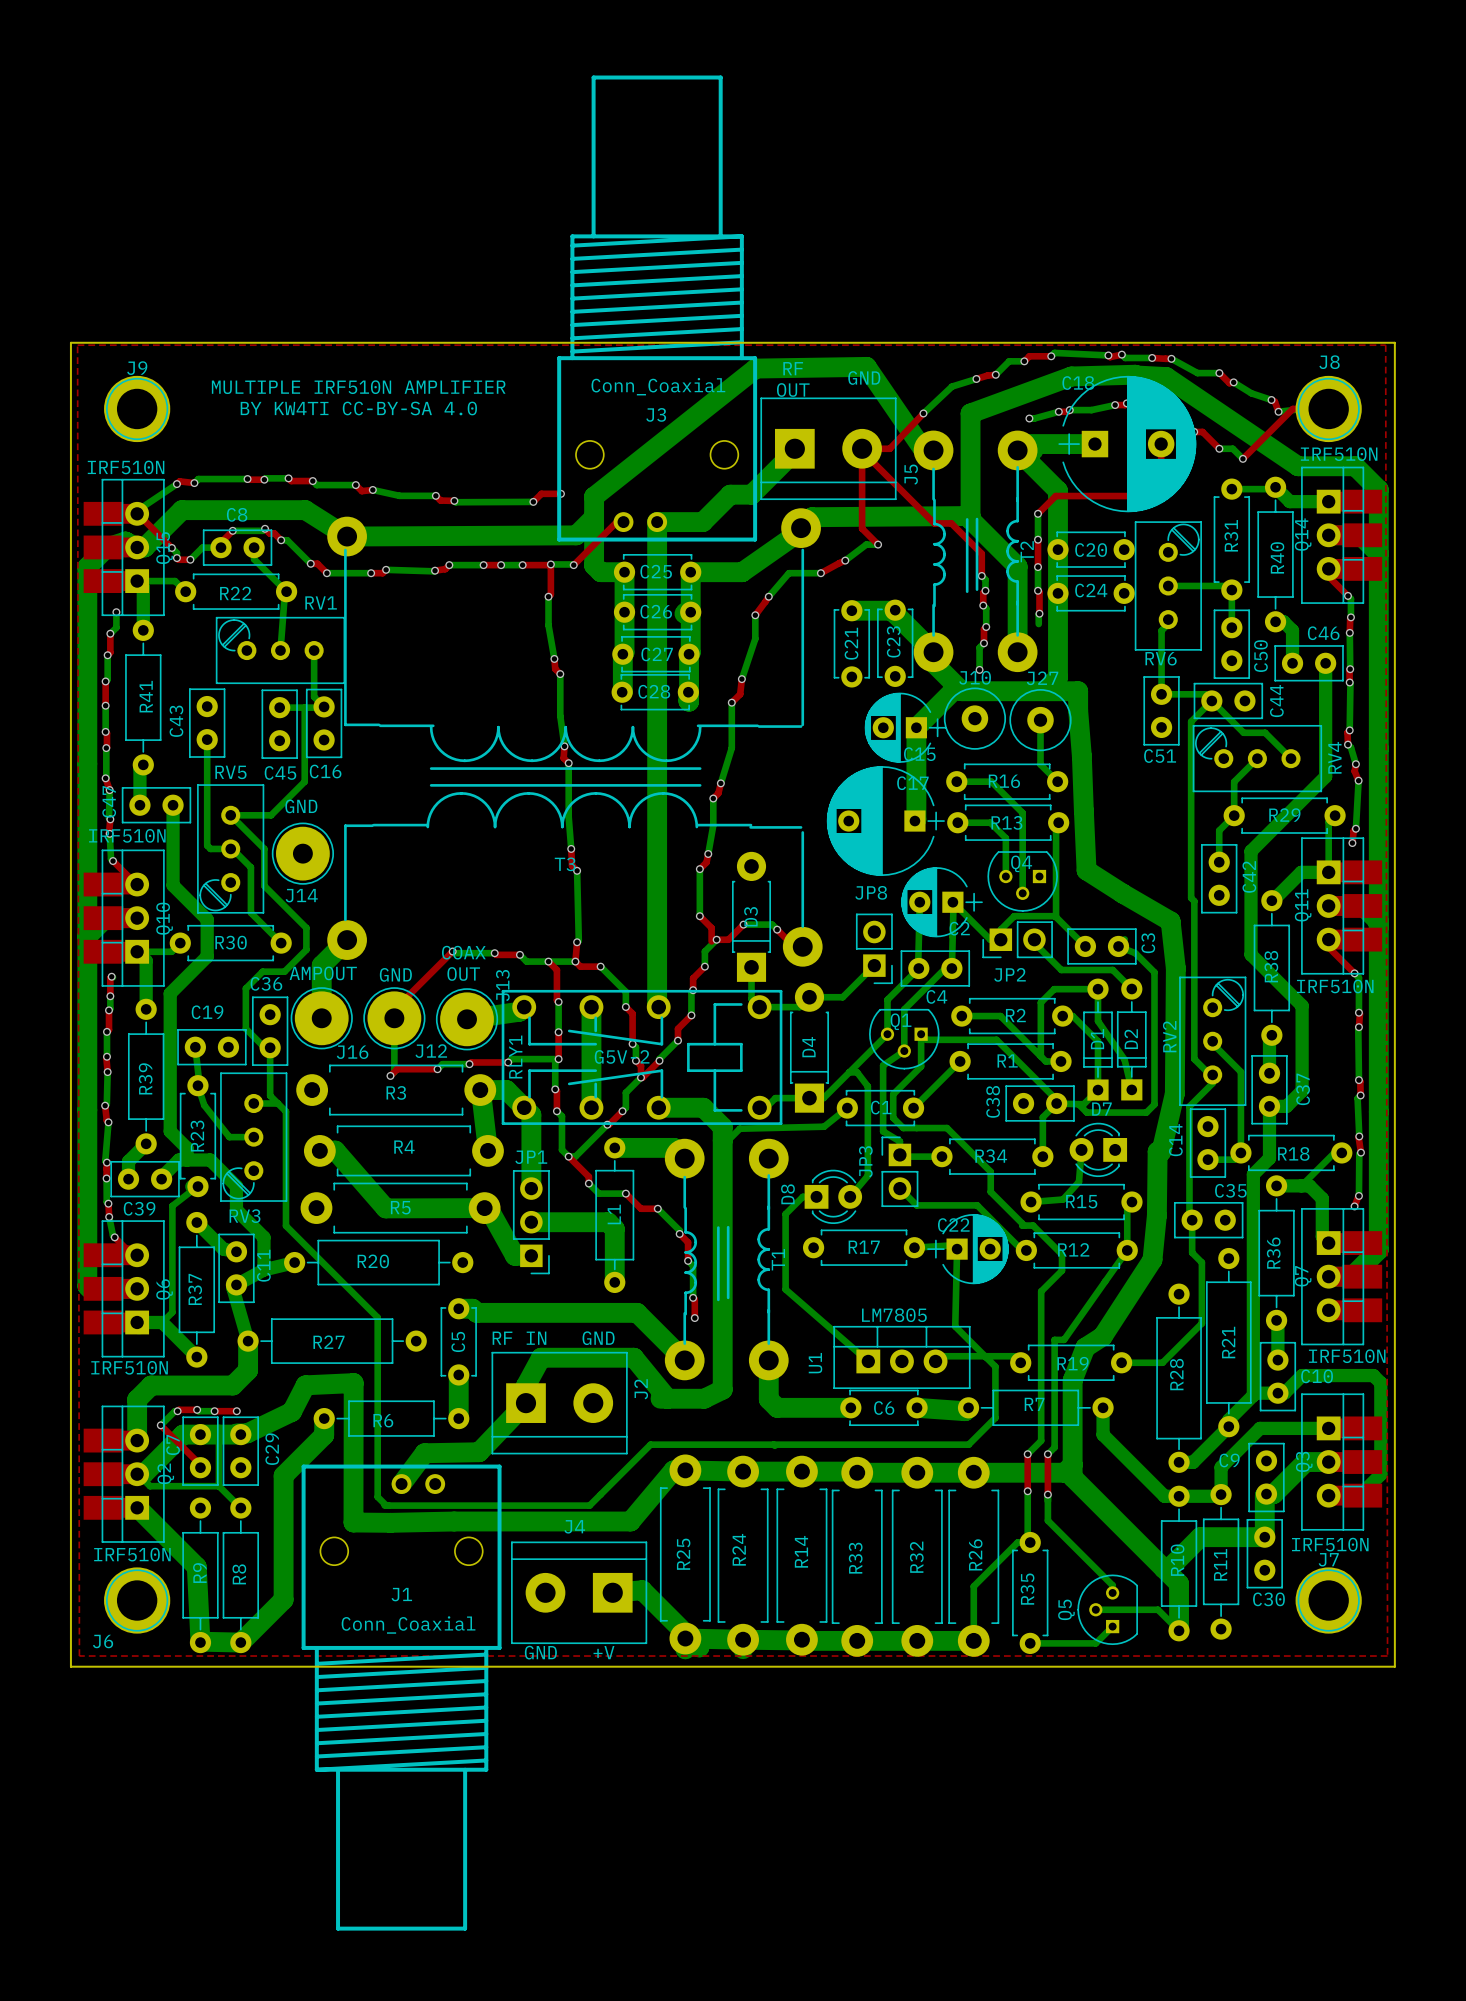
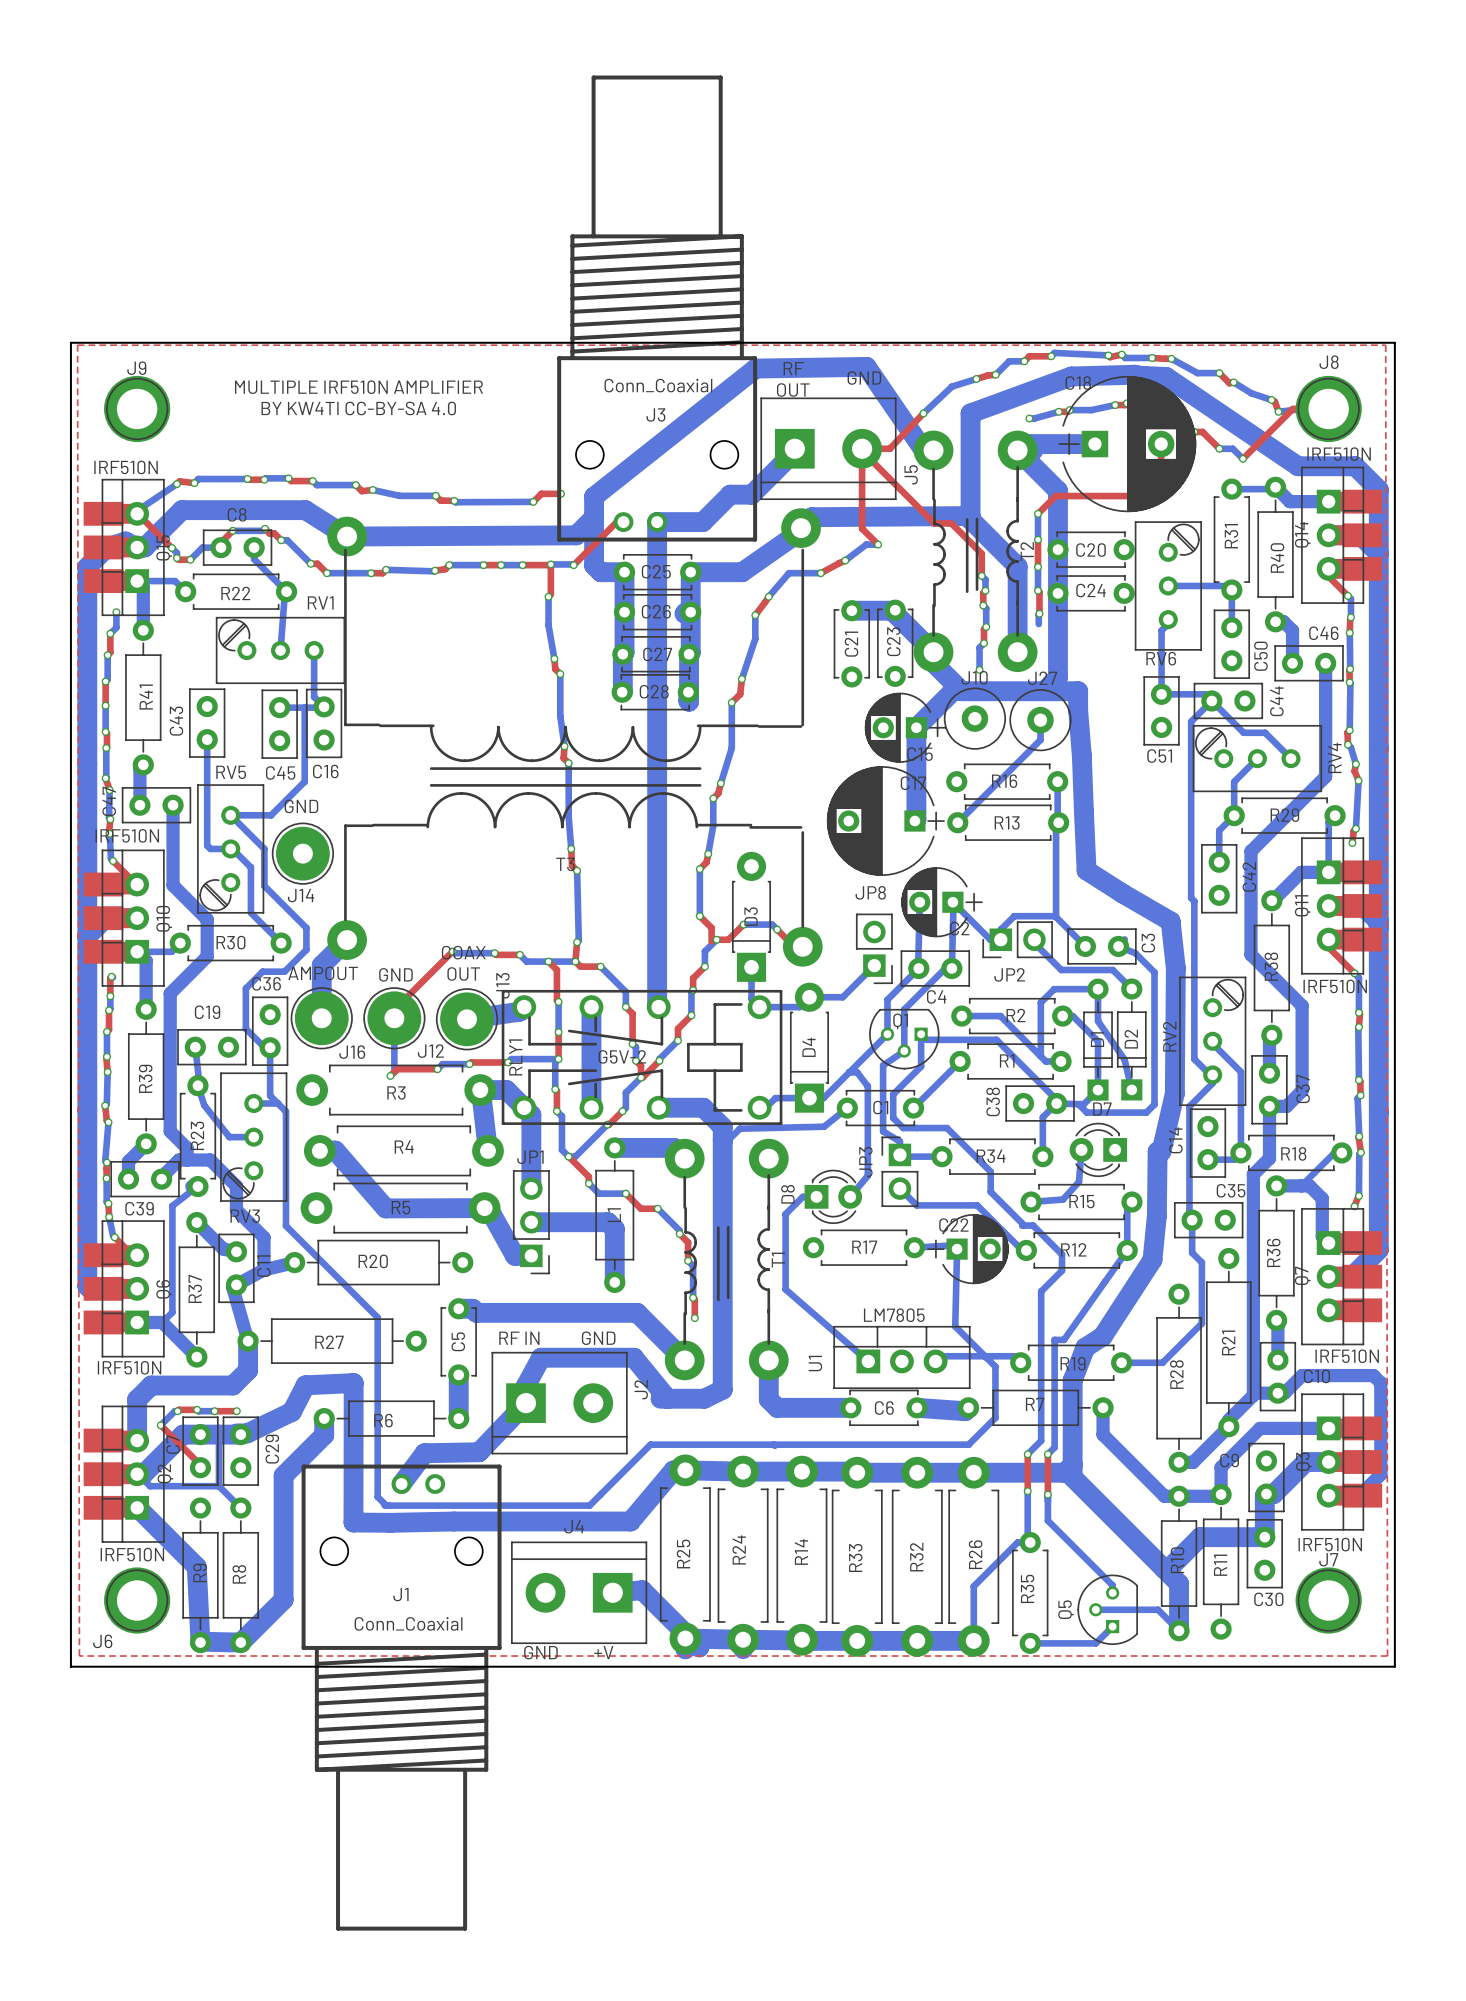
bottom track: (1040, 739) (1040, 764) (1057, 781) -> (1058, 822) (1057, 781)
bottom track: (956, 781) (991, 781) (1022, 812) (1022, 893) -> none
bottom track: (957, 822) (990, 822) (1005, 838) (1005, 876) -> (957, 822) (1040, 739)
Q4: (1022, 881) -> none

